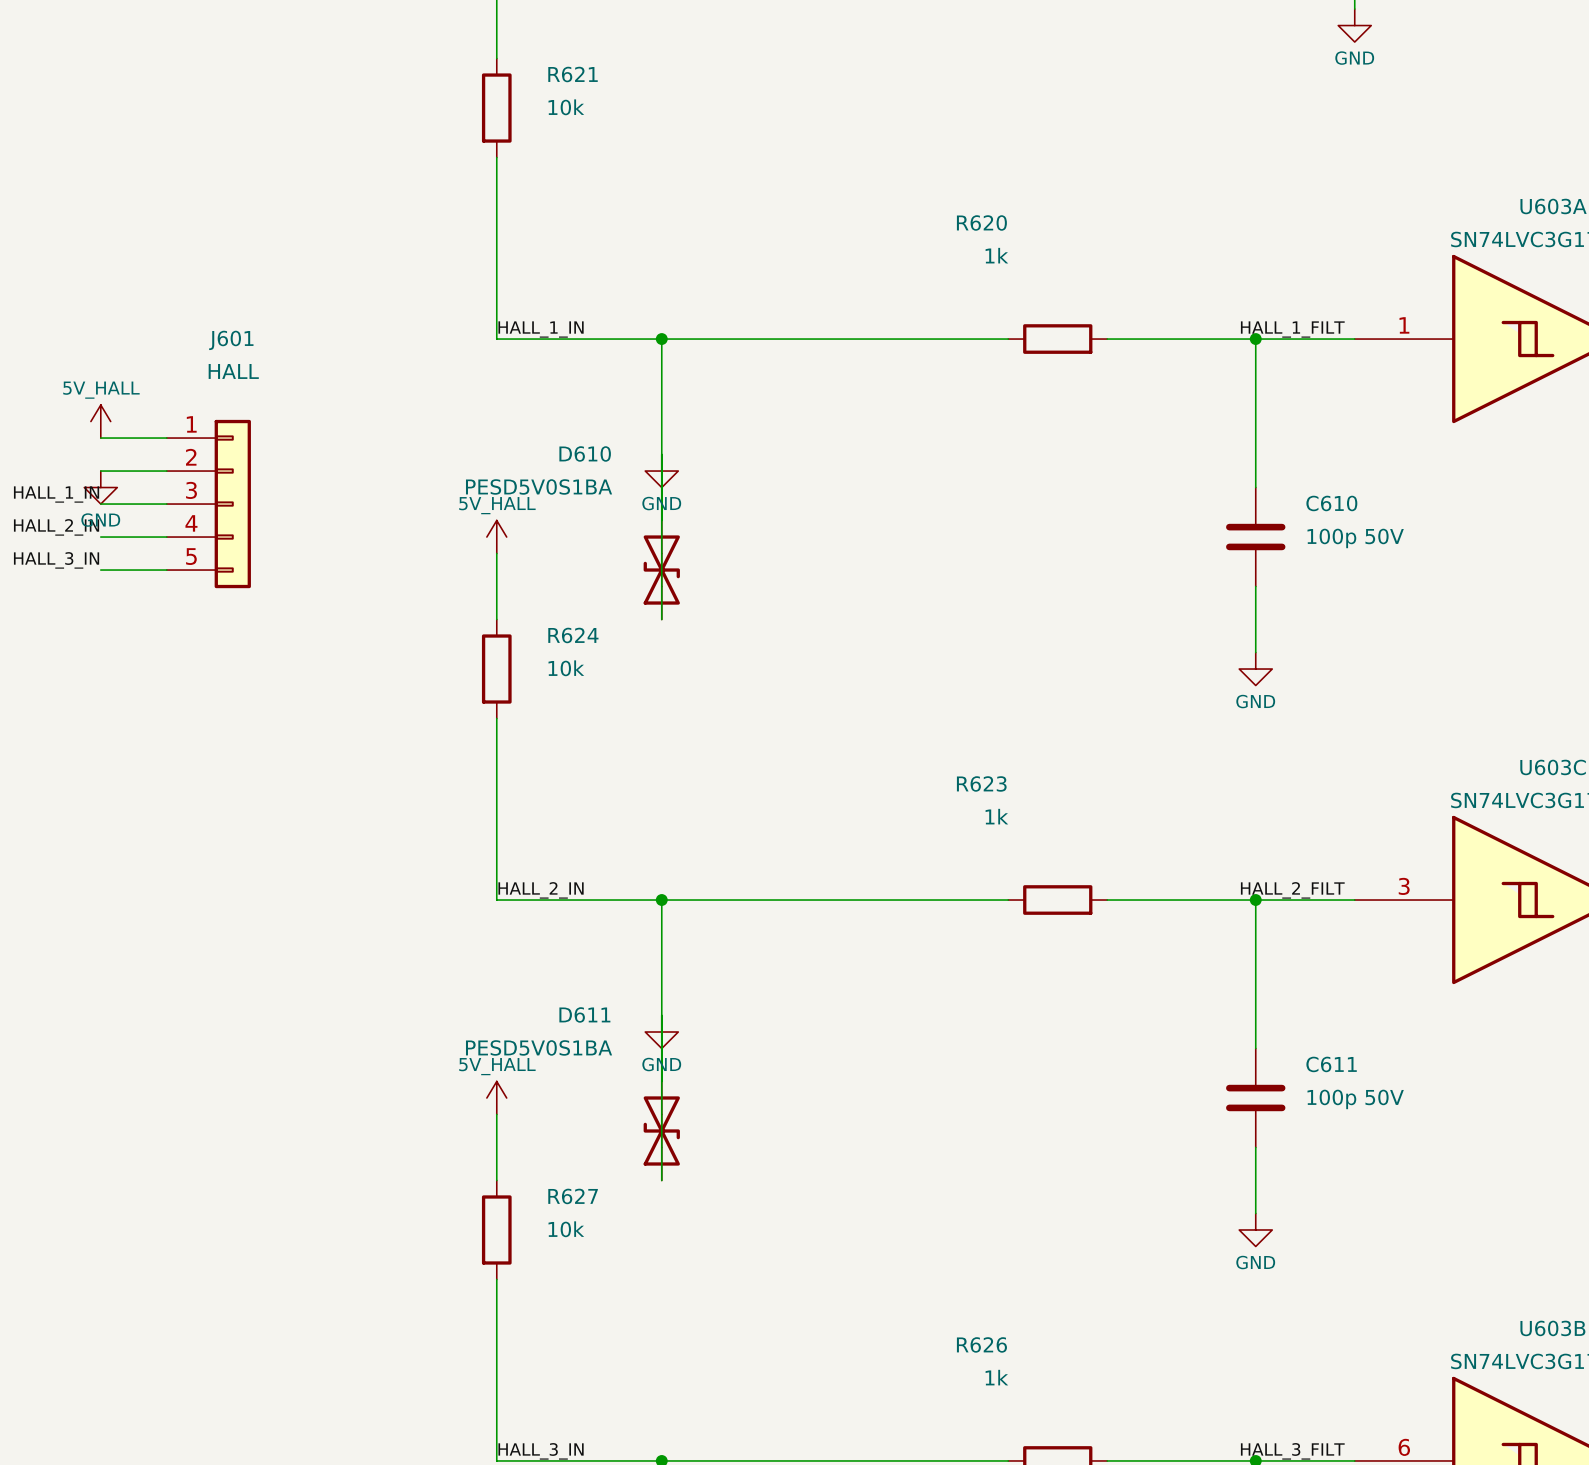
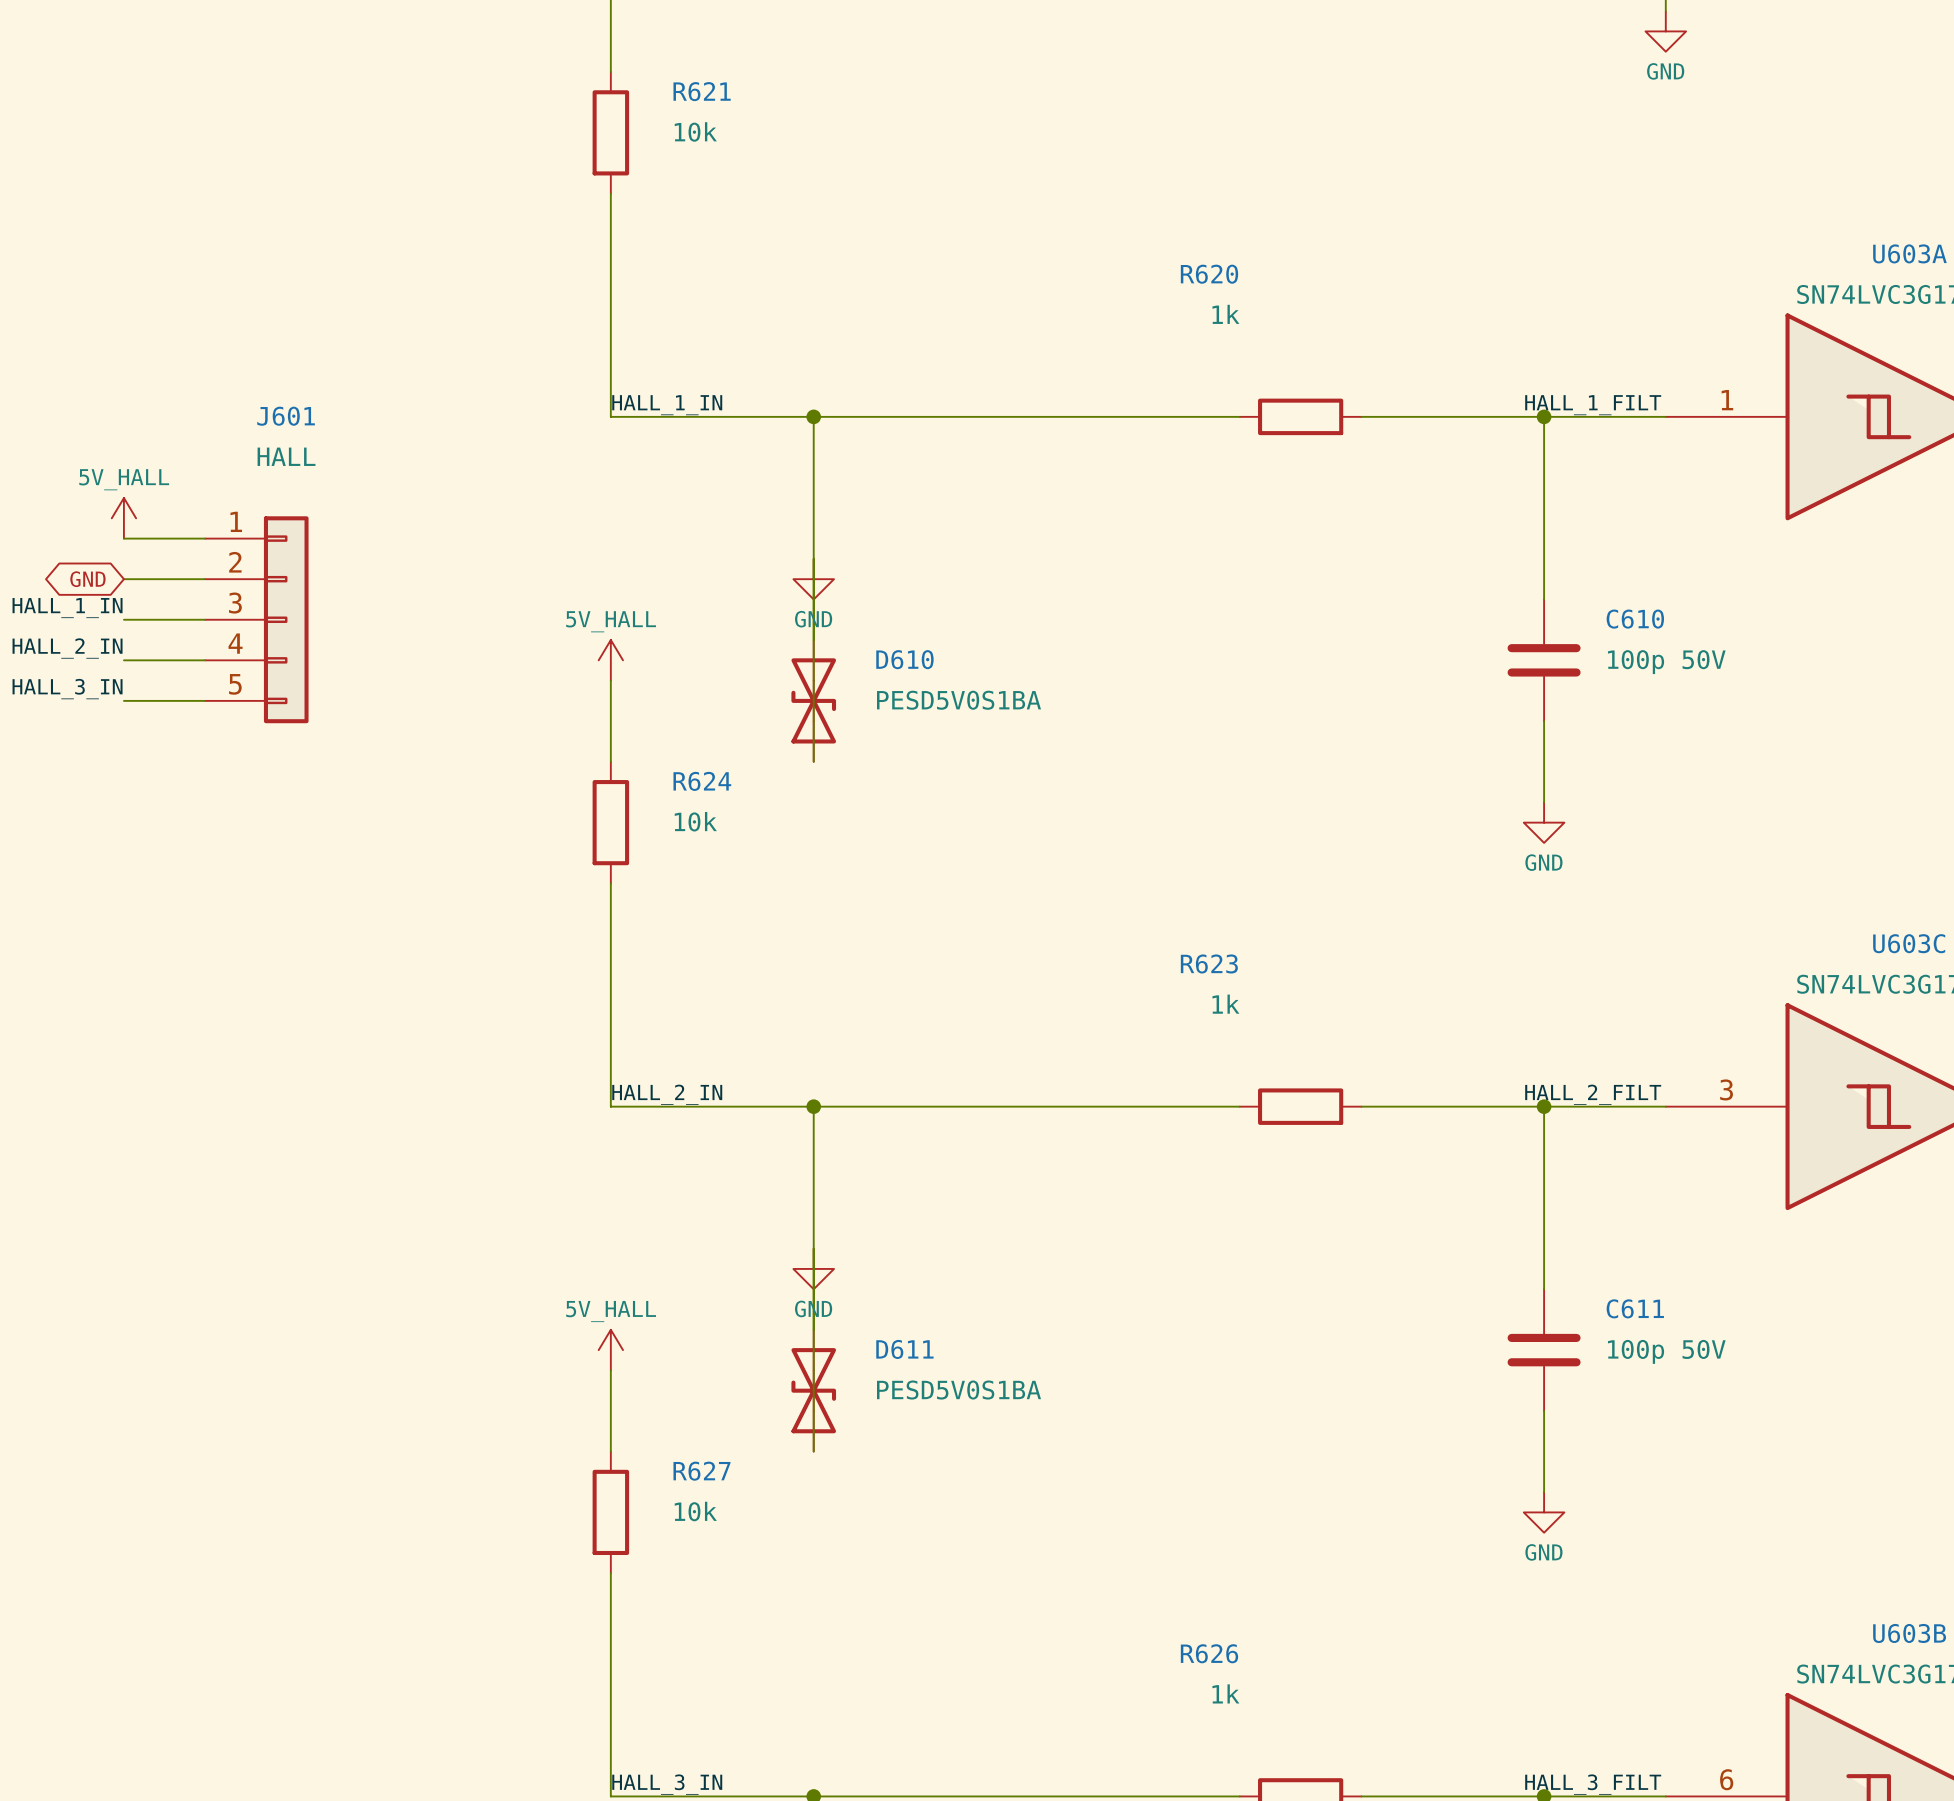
D610 name position: D610 (585, 453) -> D610 (904, 659)
global label: none -> GND (87, 579)
D610 value position: PESD5V0S1BA (539, 486) -> PESD5V0S1BA (959, 700)
power symbol: GND (100, 487) -> none
D611 name position: D611 (584, 1014) -> D611 (904, 1349)
D611 value position: PESD5V0S1BA (539, 1047) -> PESD5V0S1BA (959, 1390)

